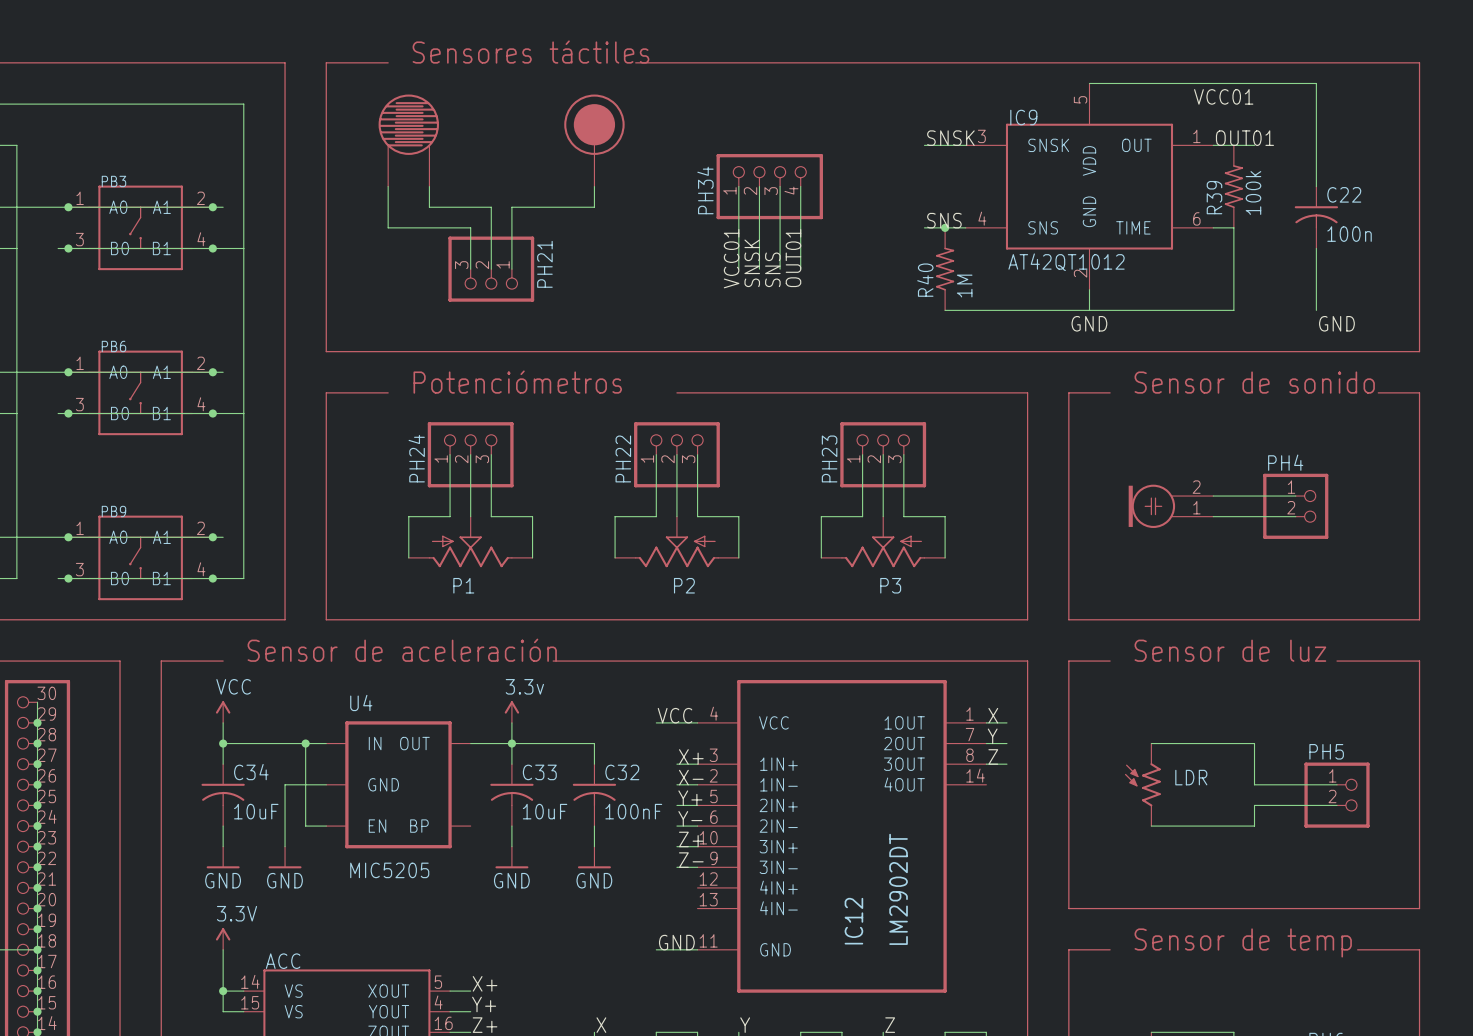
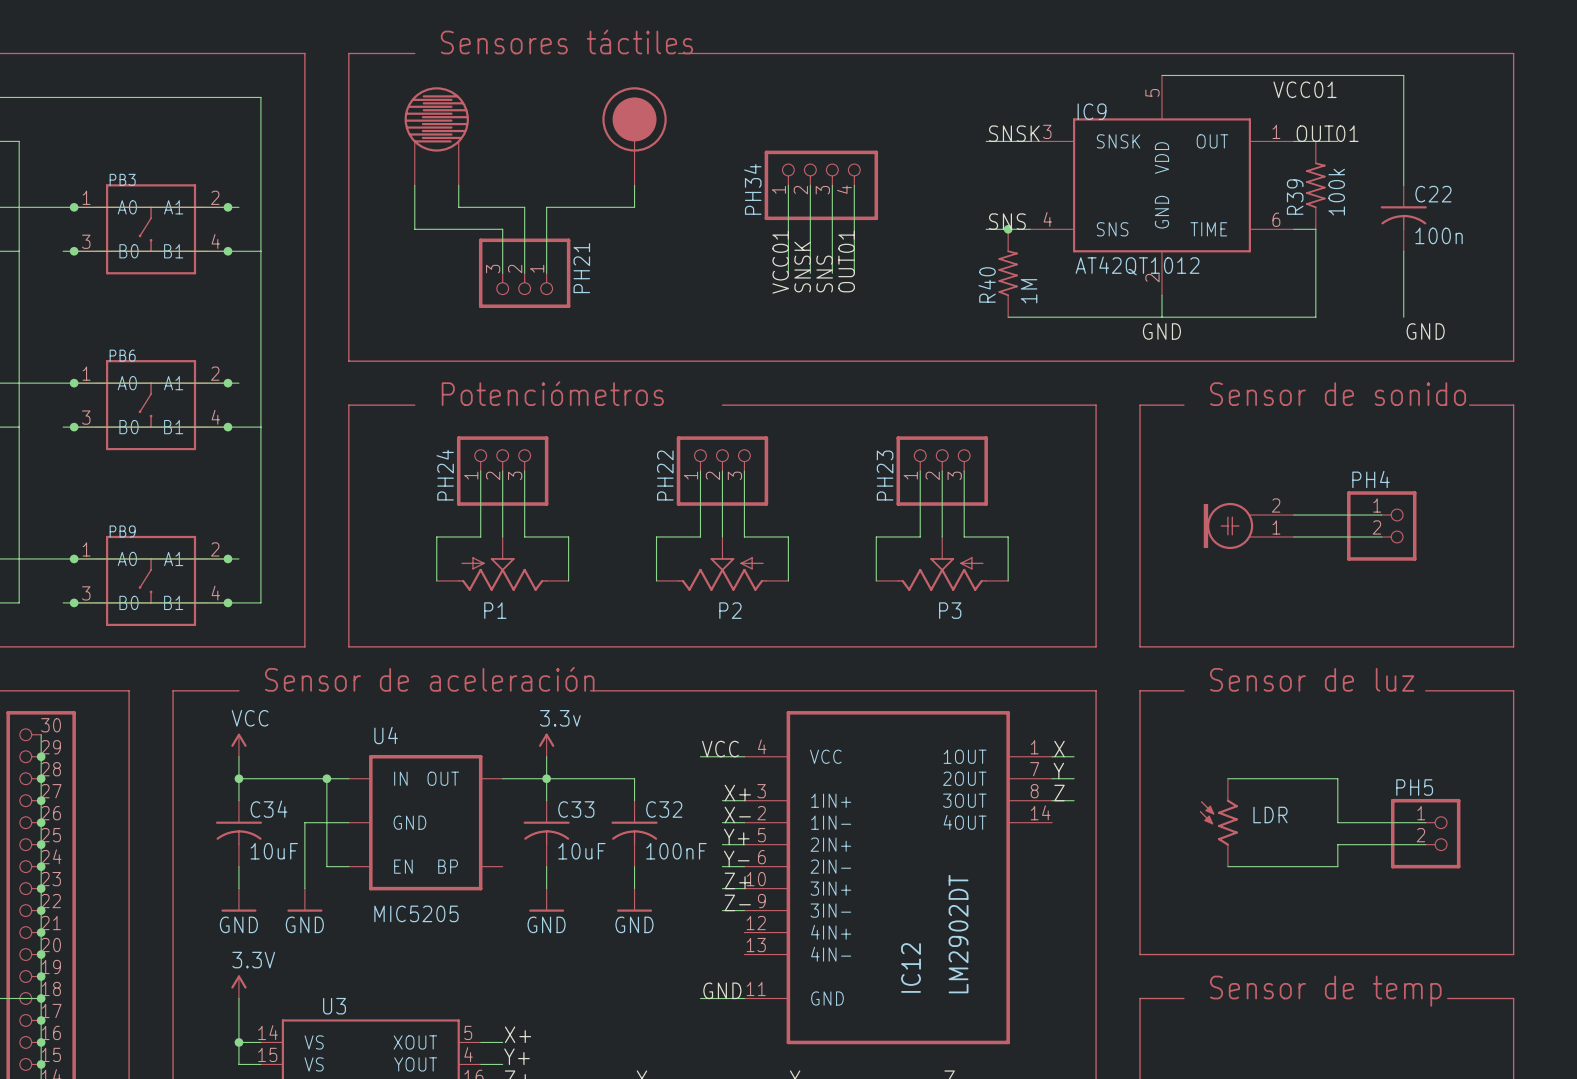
ACC name: ACC (283, 961) -> U3 (334, 1006)

